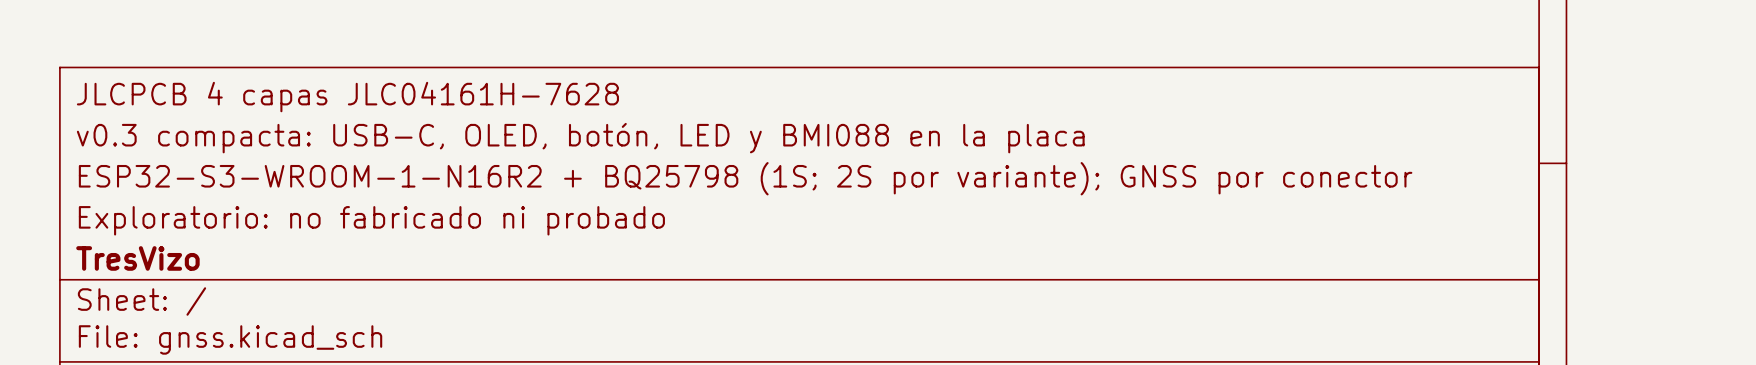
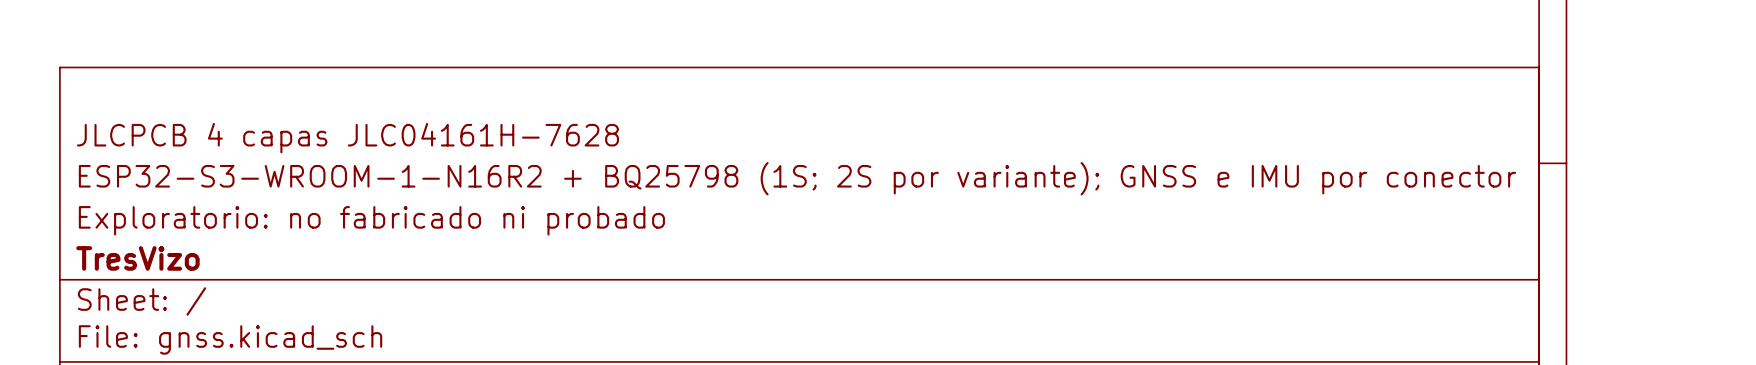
title block: JLCPCB 4 capas JLC04161H-7628 (347, 97) -> none
title block: v0.3 compacta: USB-C, OLED, botón, LED y BMI088 en la placa (580, 138) -> JLCPCB 4 capas JLC04161H-7628 (347, 138)
title block: ESP32-S3-WROOM-1-N16R2 + BQ25798 (1S; 2S por variante); GNSS por conector (745, 178) -> ESP32-S3-WROOM-1-N16R2 + BQ25798 (1S; 2S por variante); GNSS e IMU por conector (797, 178)

